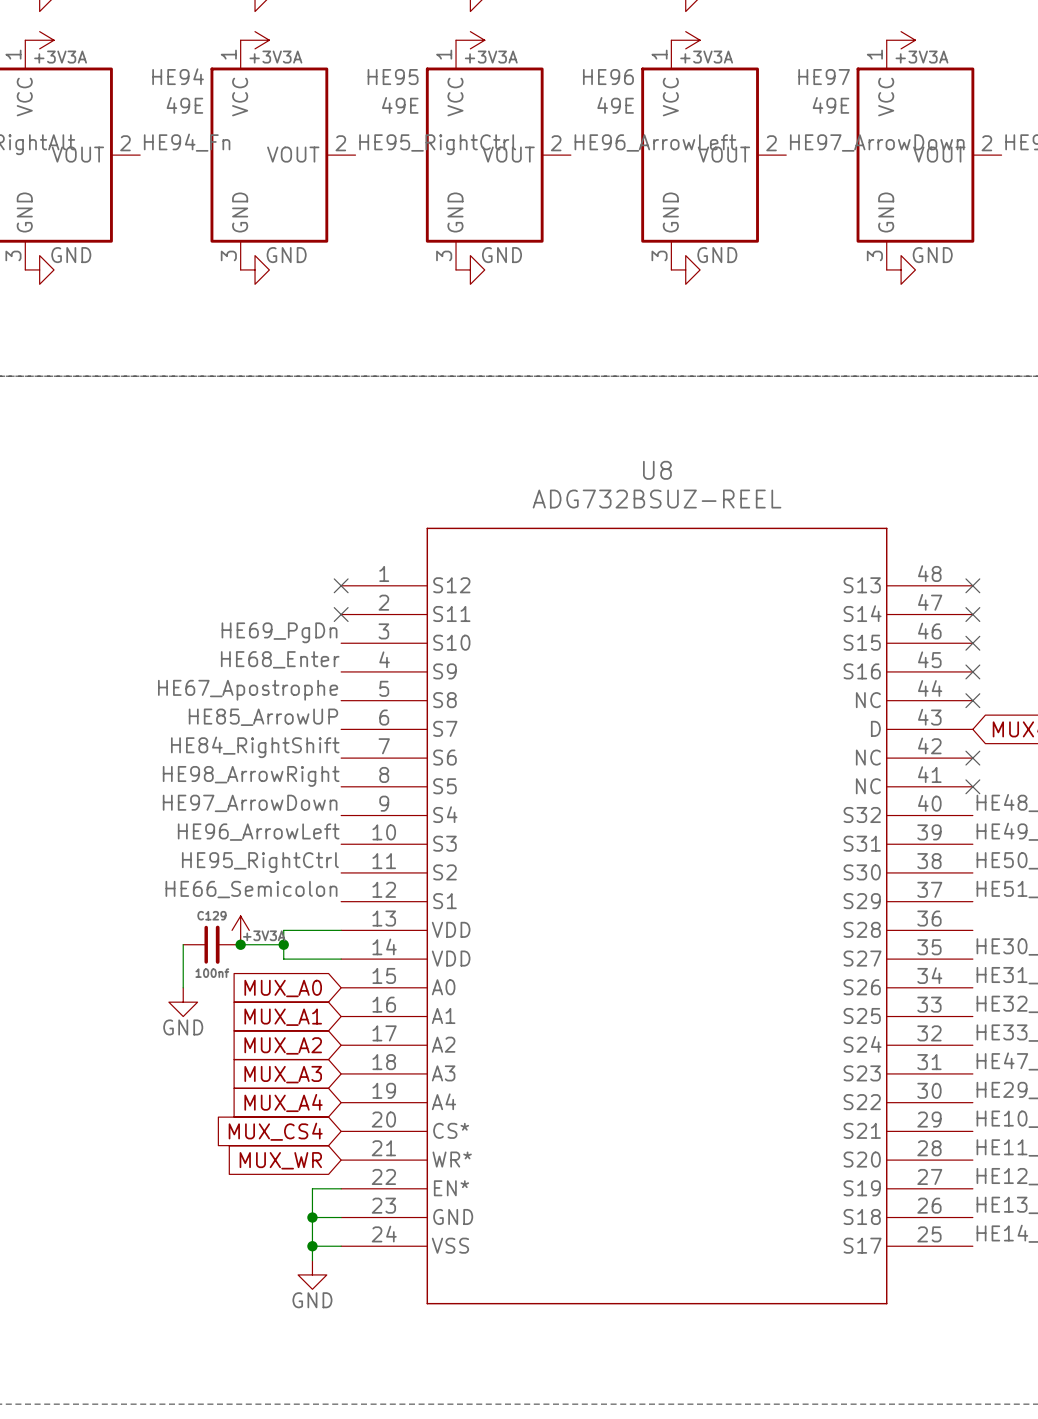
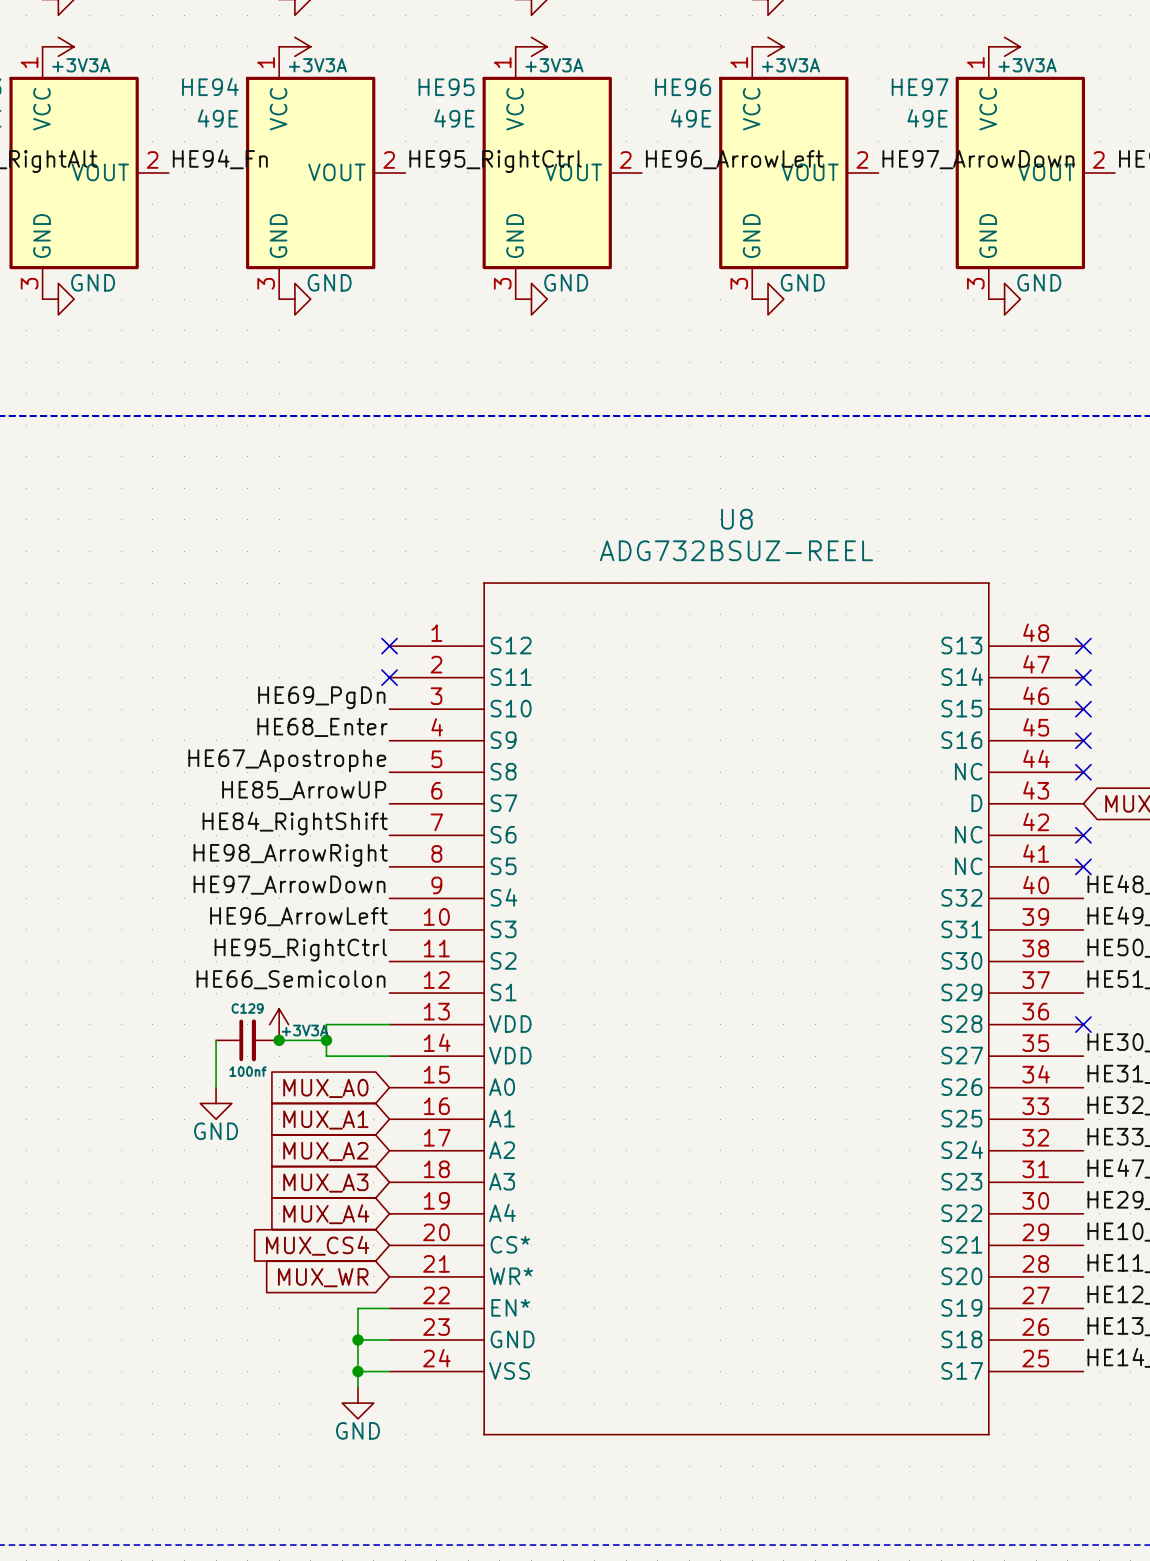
no-connect mark: none -> (1083, 1024)

